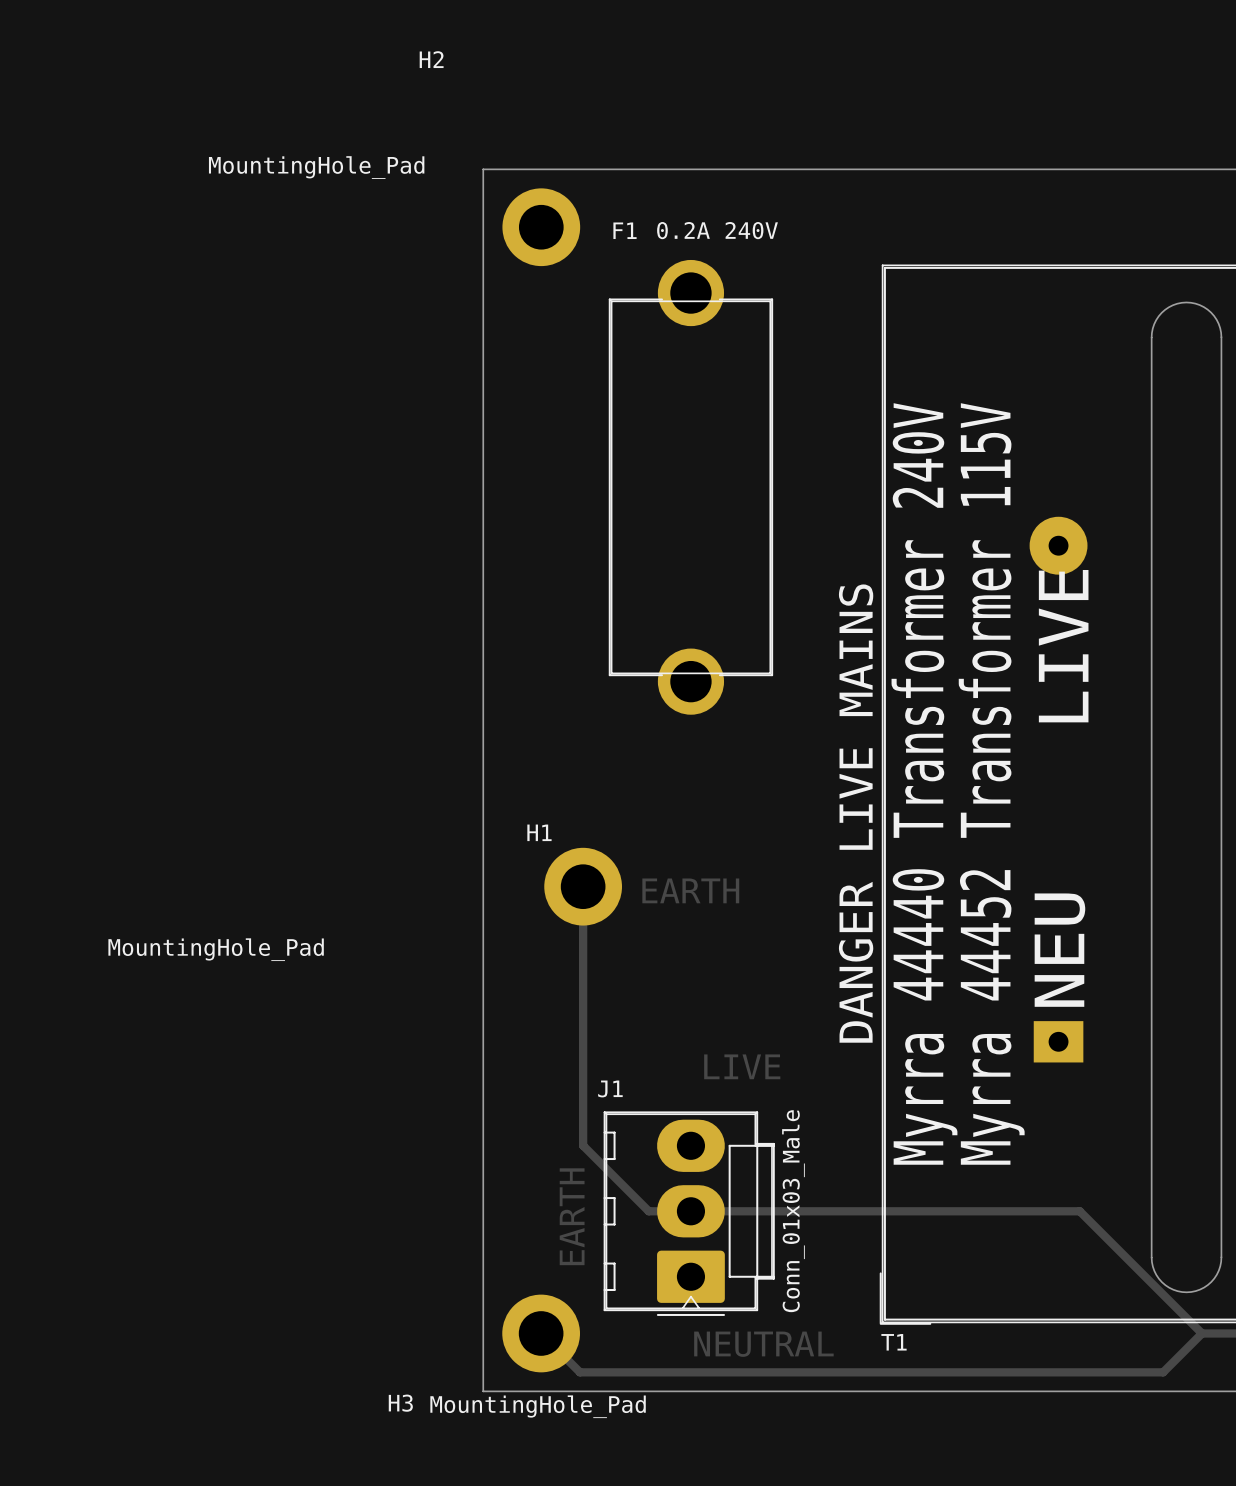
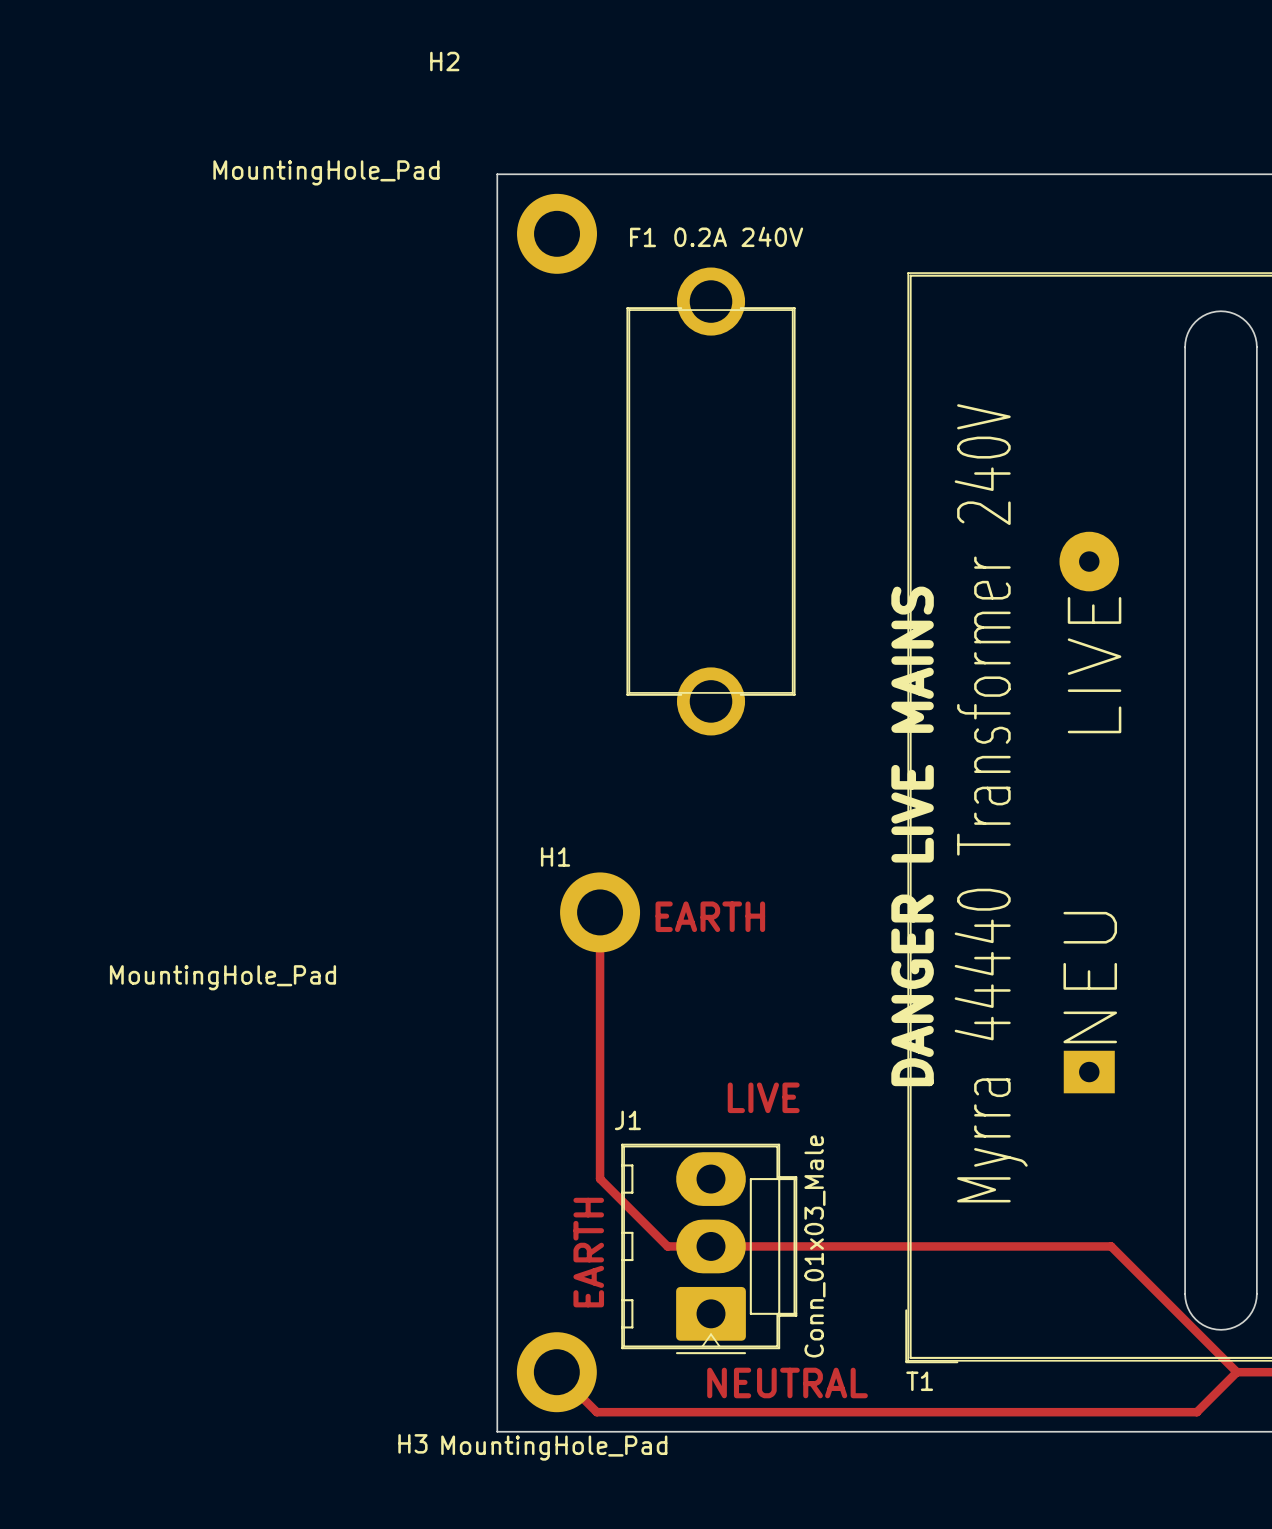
T1 value position: Myrra 44440 Transformer 240V (924, 783) -> Myrra 44440 Transformer 240V (991, 803)
text: Myrra 44452 Transformer 115V (991, 783) -> none
text position: DANGER LIVE MAINS (856, 813) -> DANGER LIVE MAINS (912, 836)

